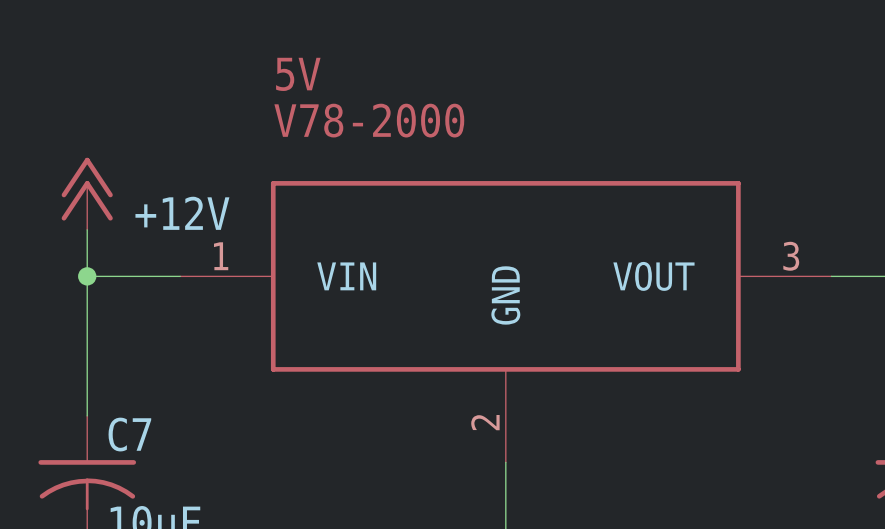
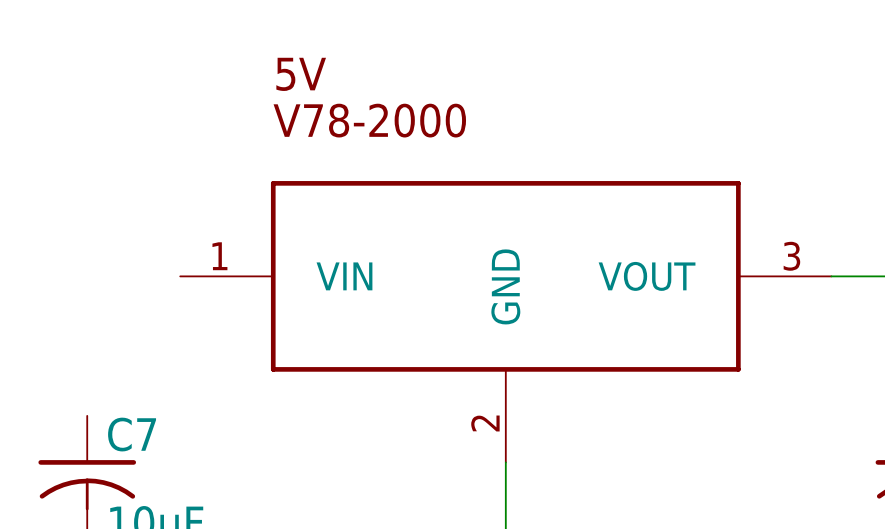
power symbol: +12V (87, 193) -> none
wire: (87, 229) (87, 415) -> none
wire: (87, 276) (180, 276) -> none
junction: (87, 276) -> none

